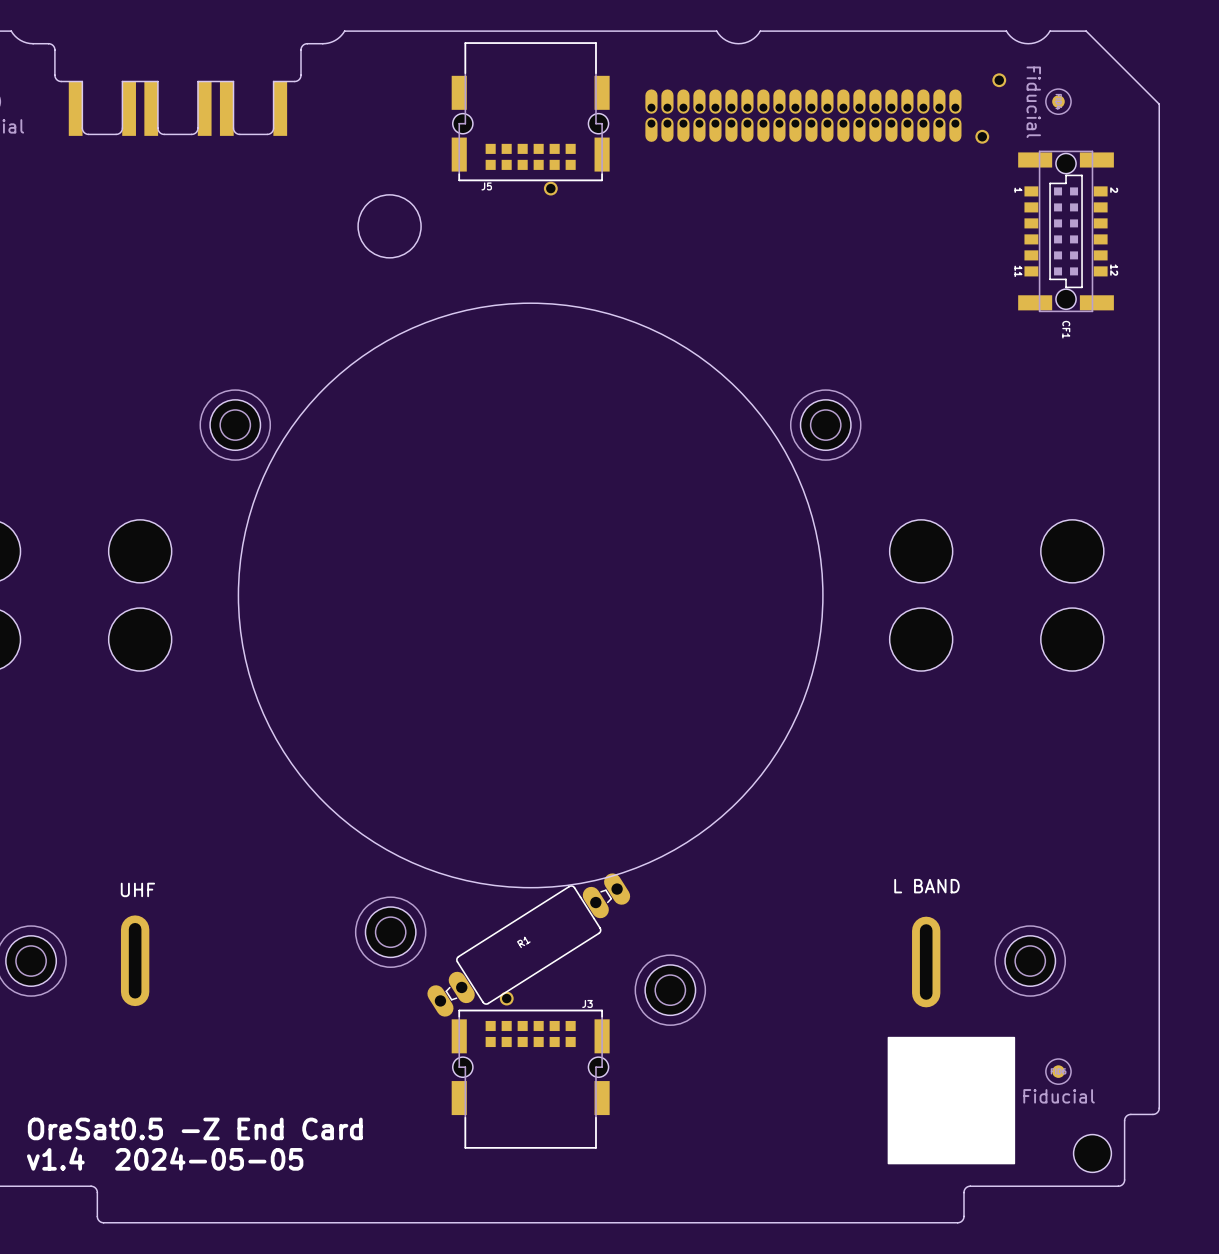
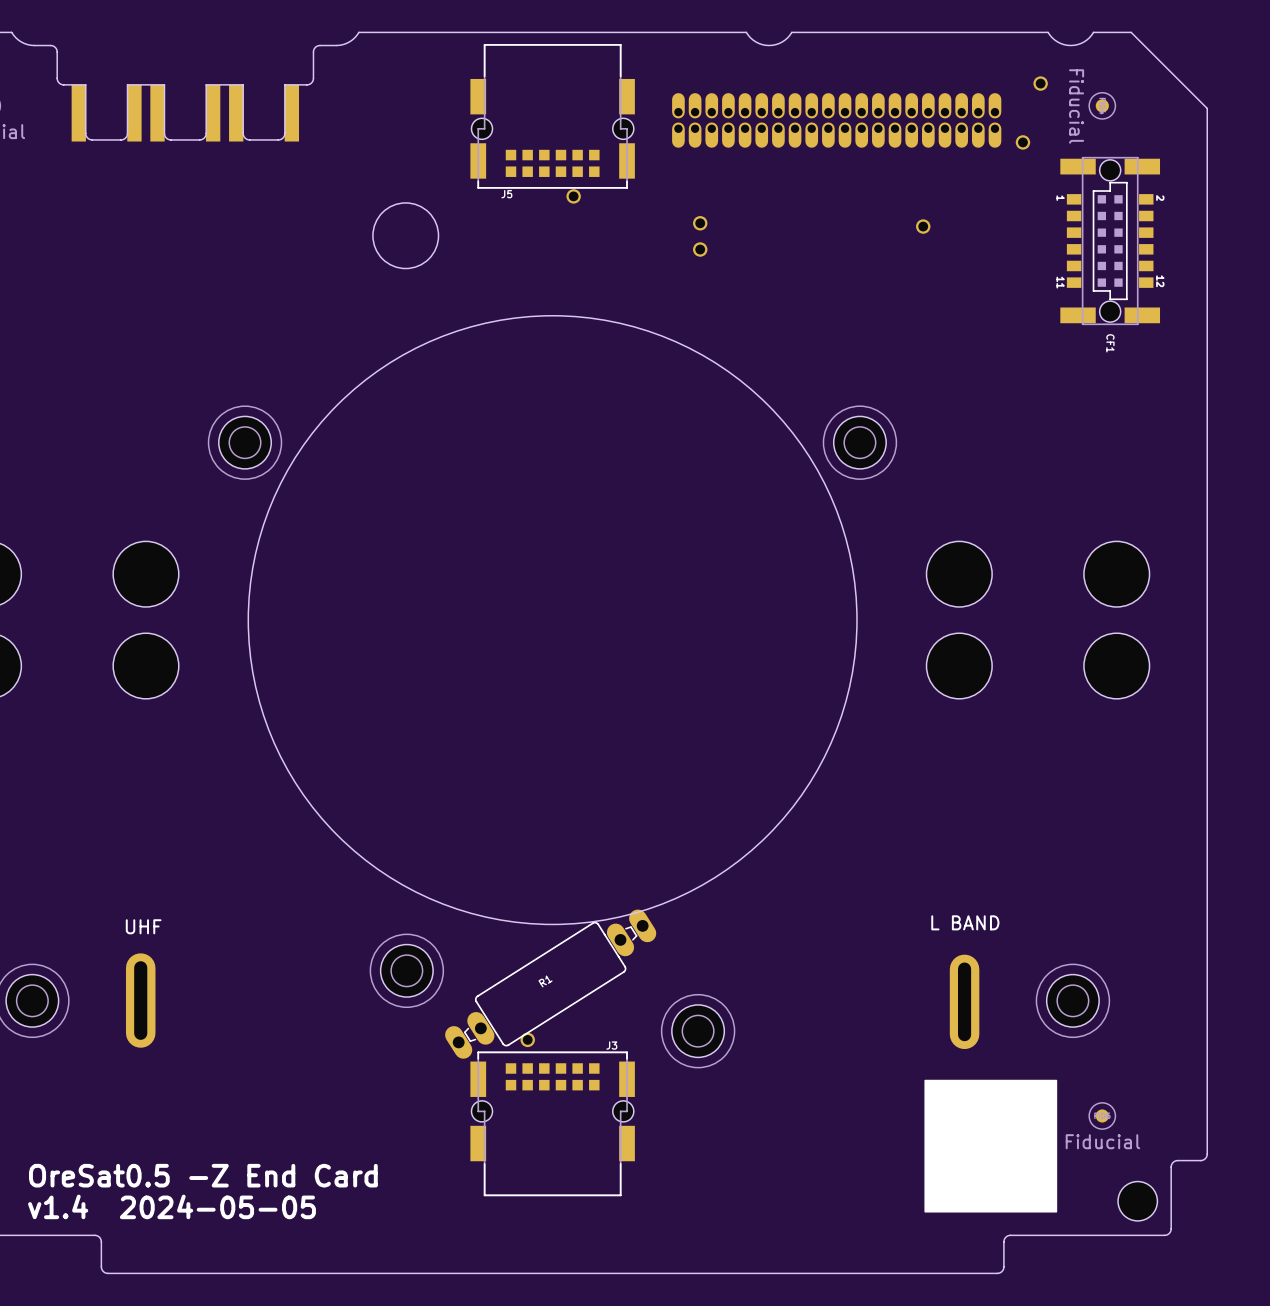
part: none -> (700, 223)
part: none -> (923, 226)
part: none -> (700, 249)

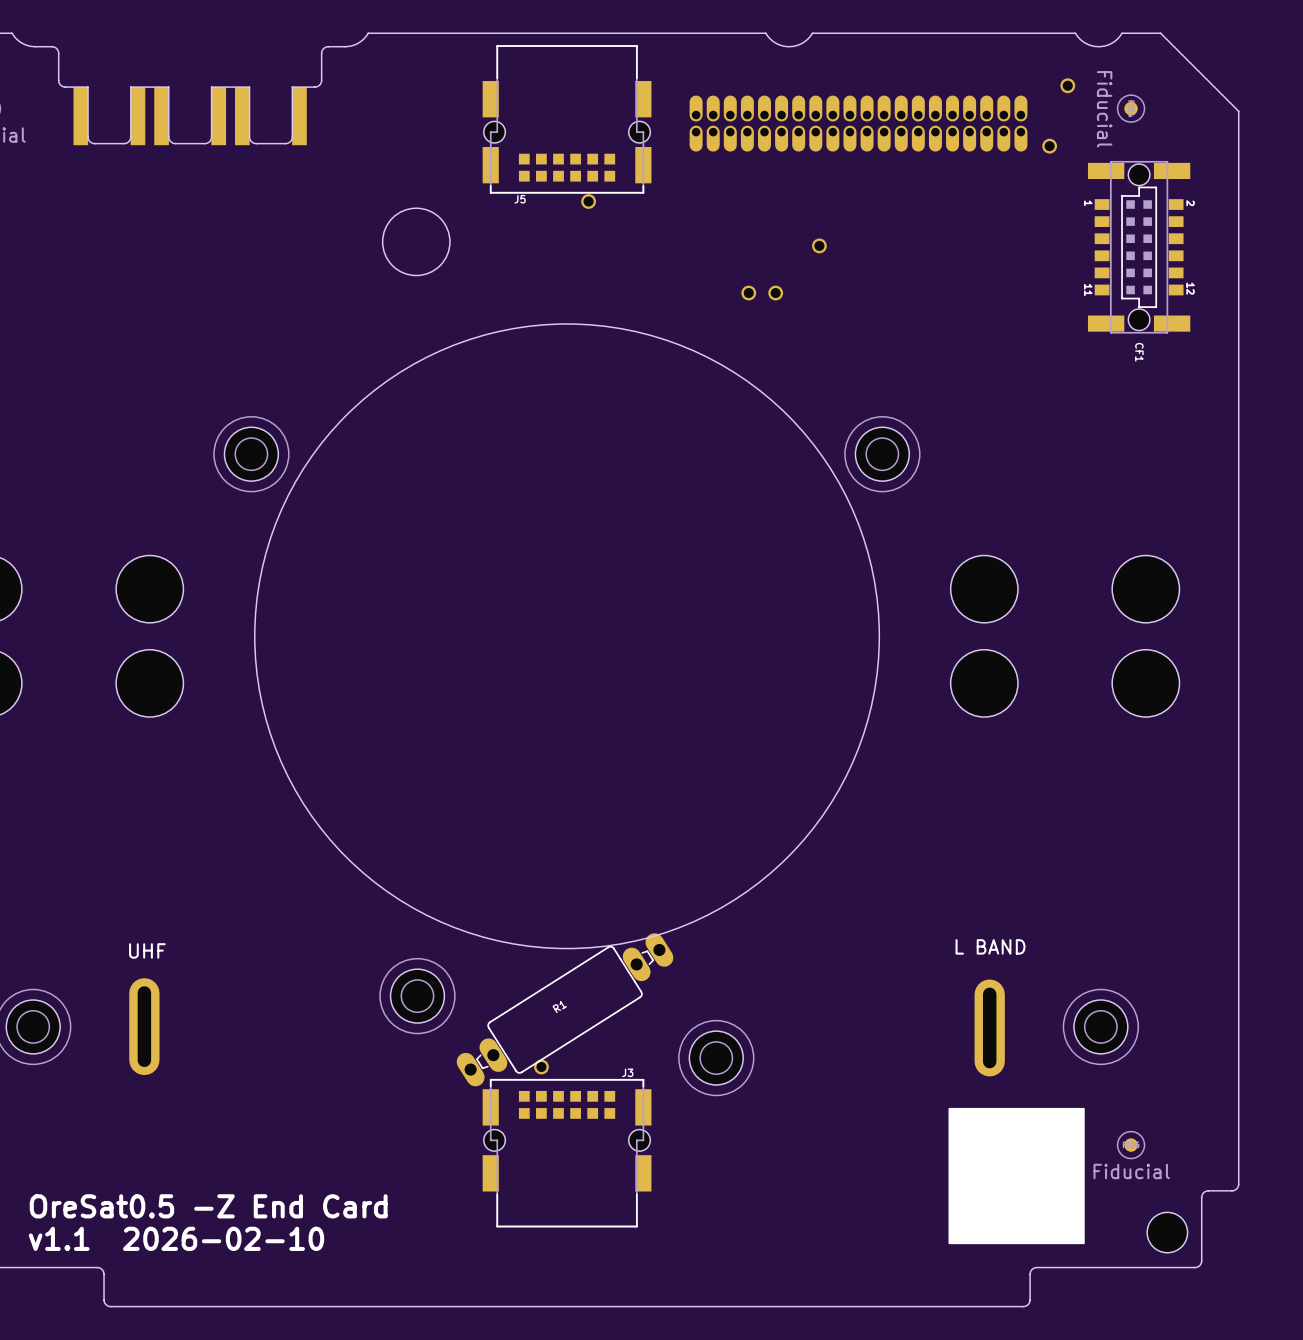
part: (700, 223) -> none
part: (923, 226) -> none
part: none -> (819, 245)
part: (700, 249) -> none
part: none -> (748, 293)
part: none -> (775, 293)
text: v1.4 2024-05-05 (171, 1206) -> v1.1 2026-02-10 (176, 1238)

